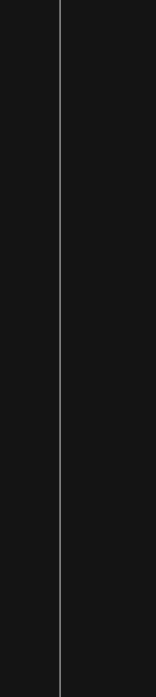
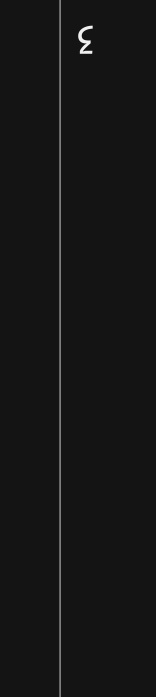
text: none -> 3 (85, 39)

